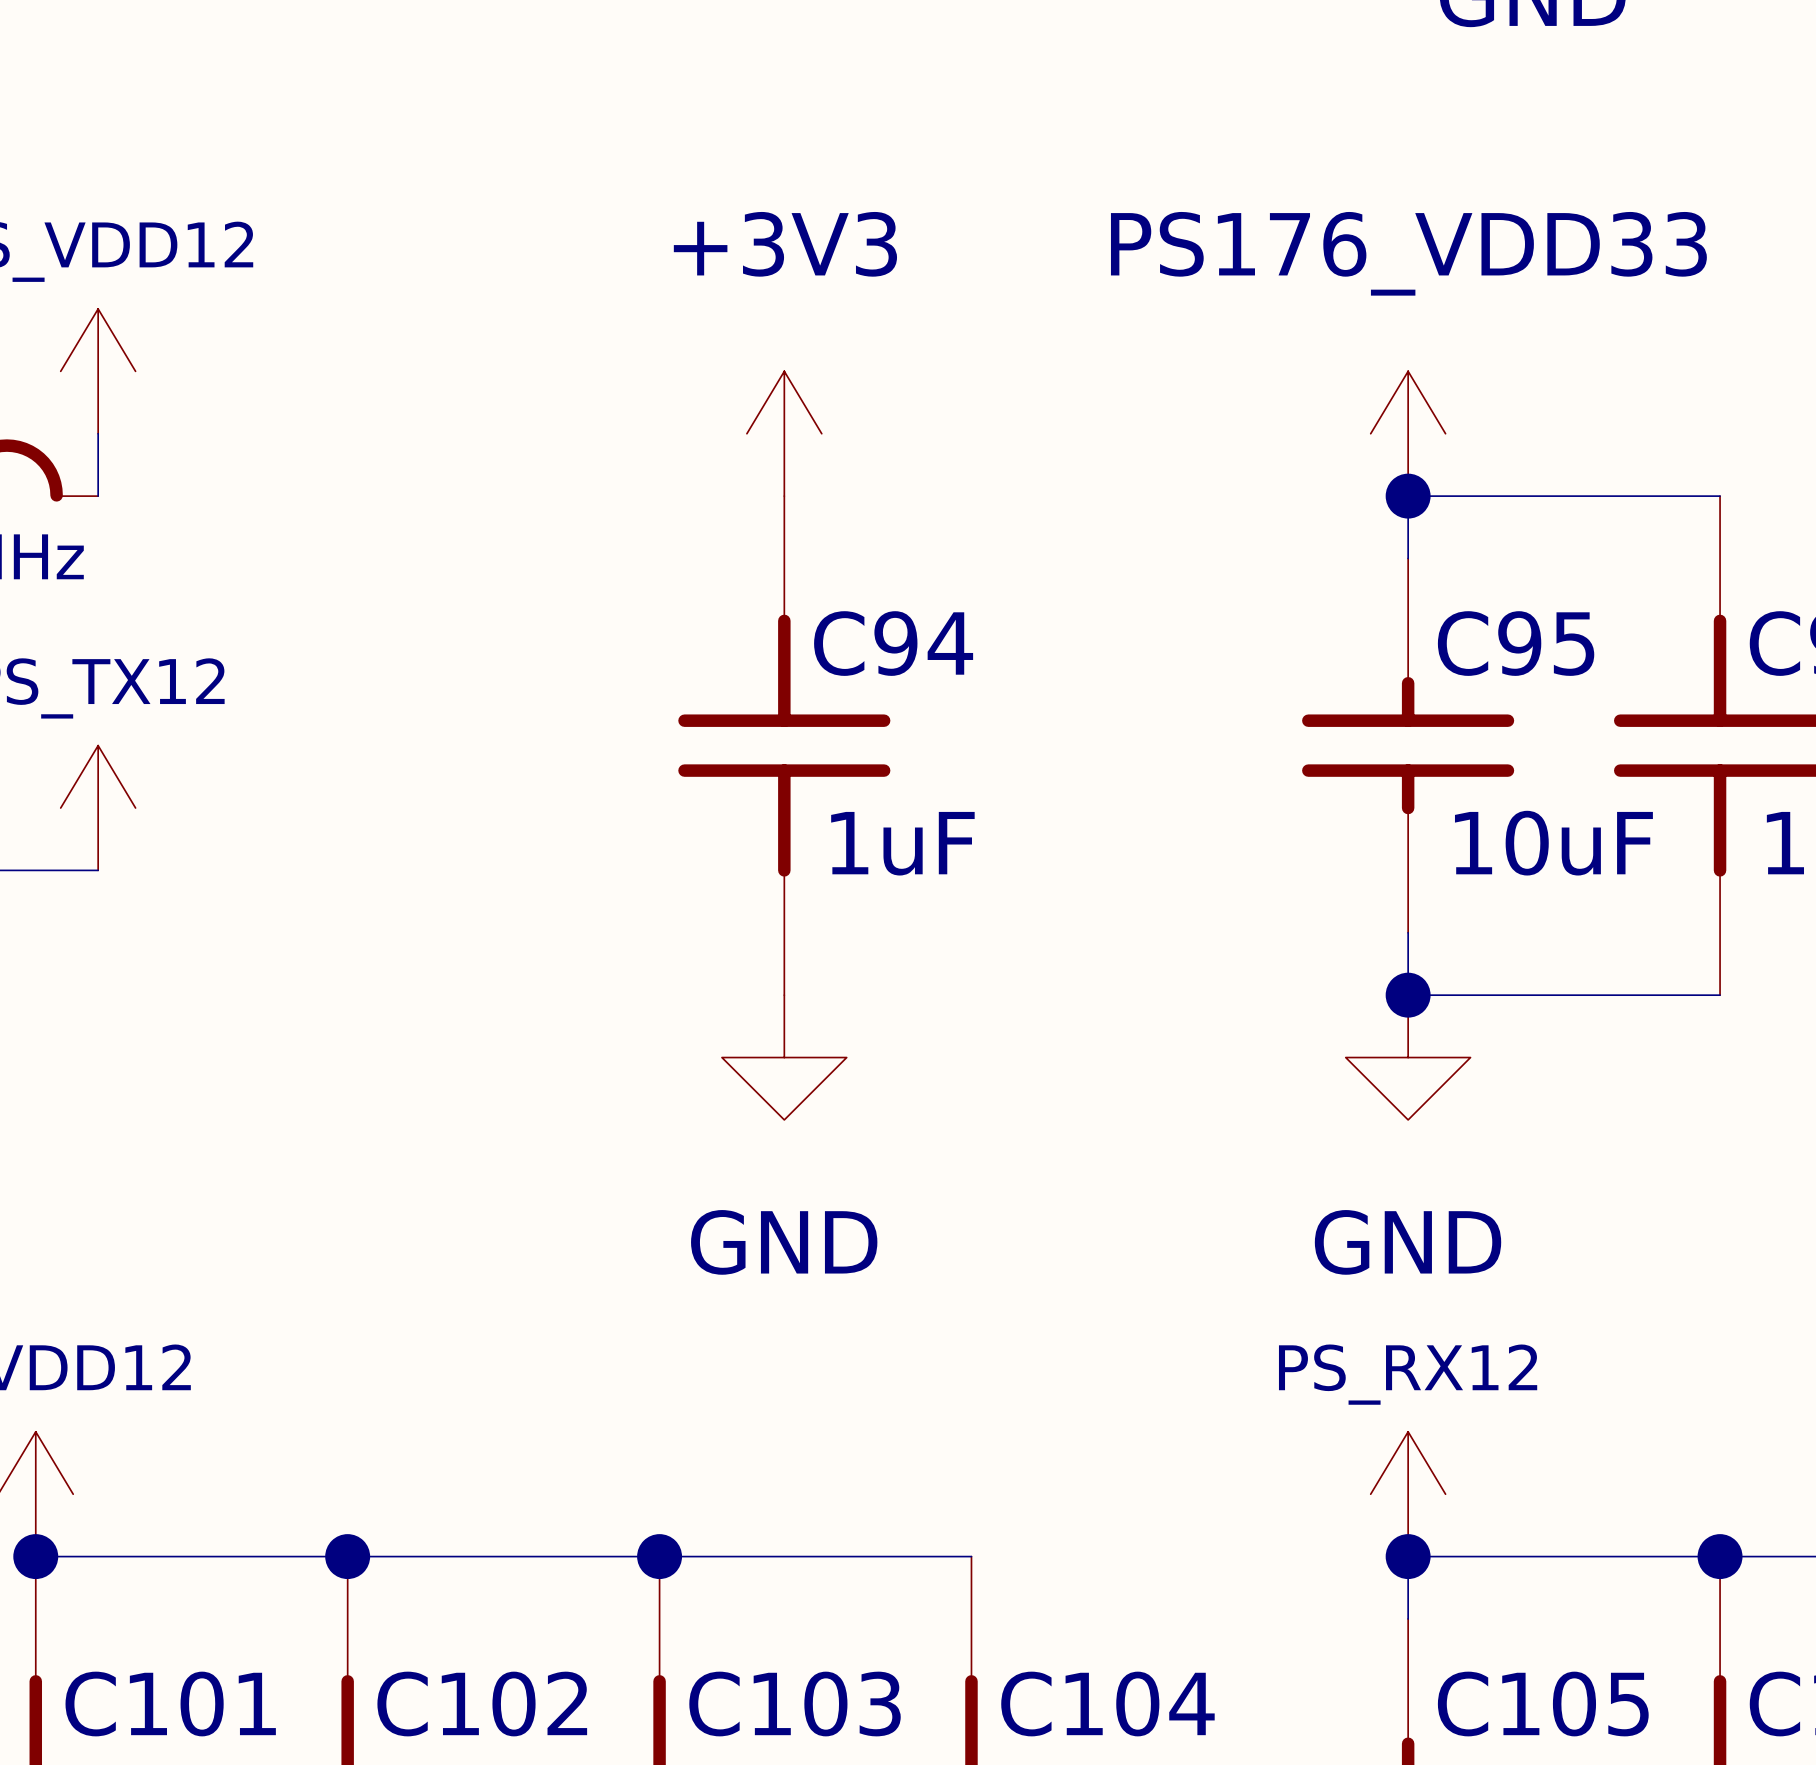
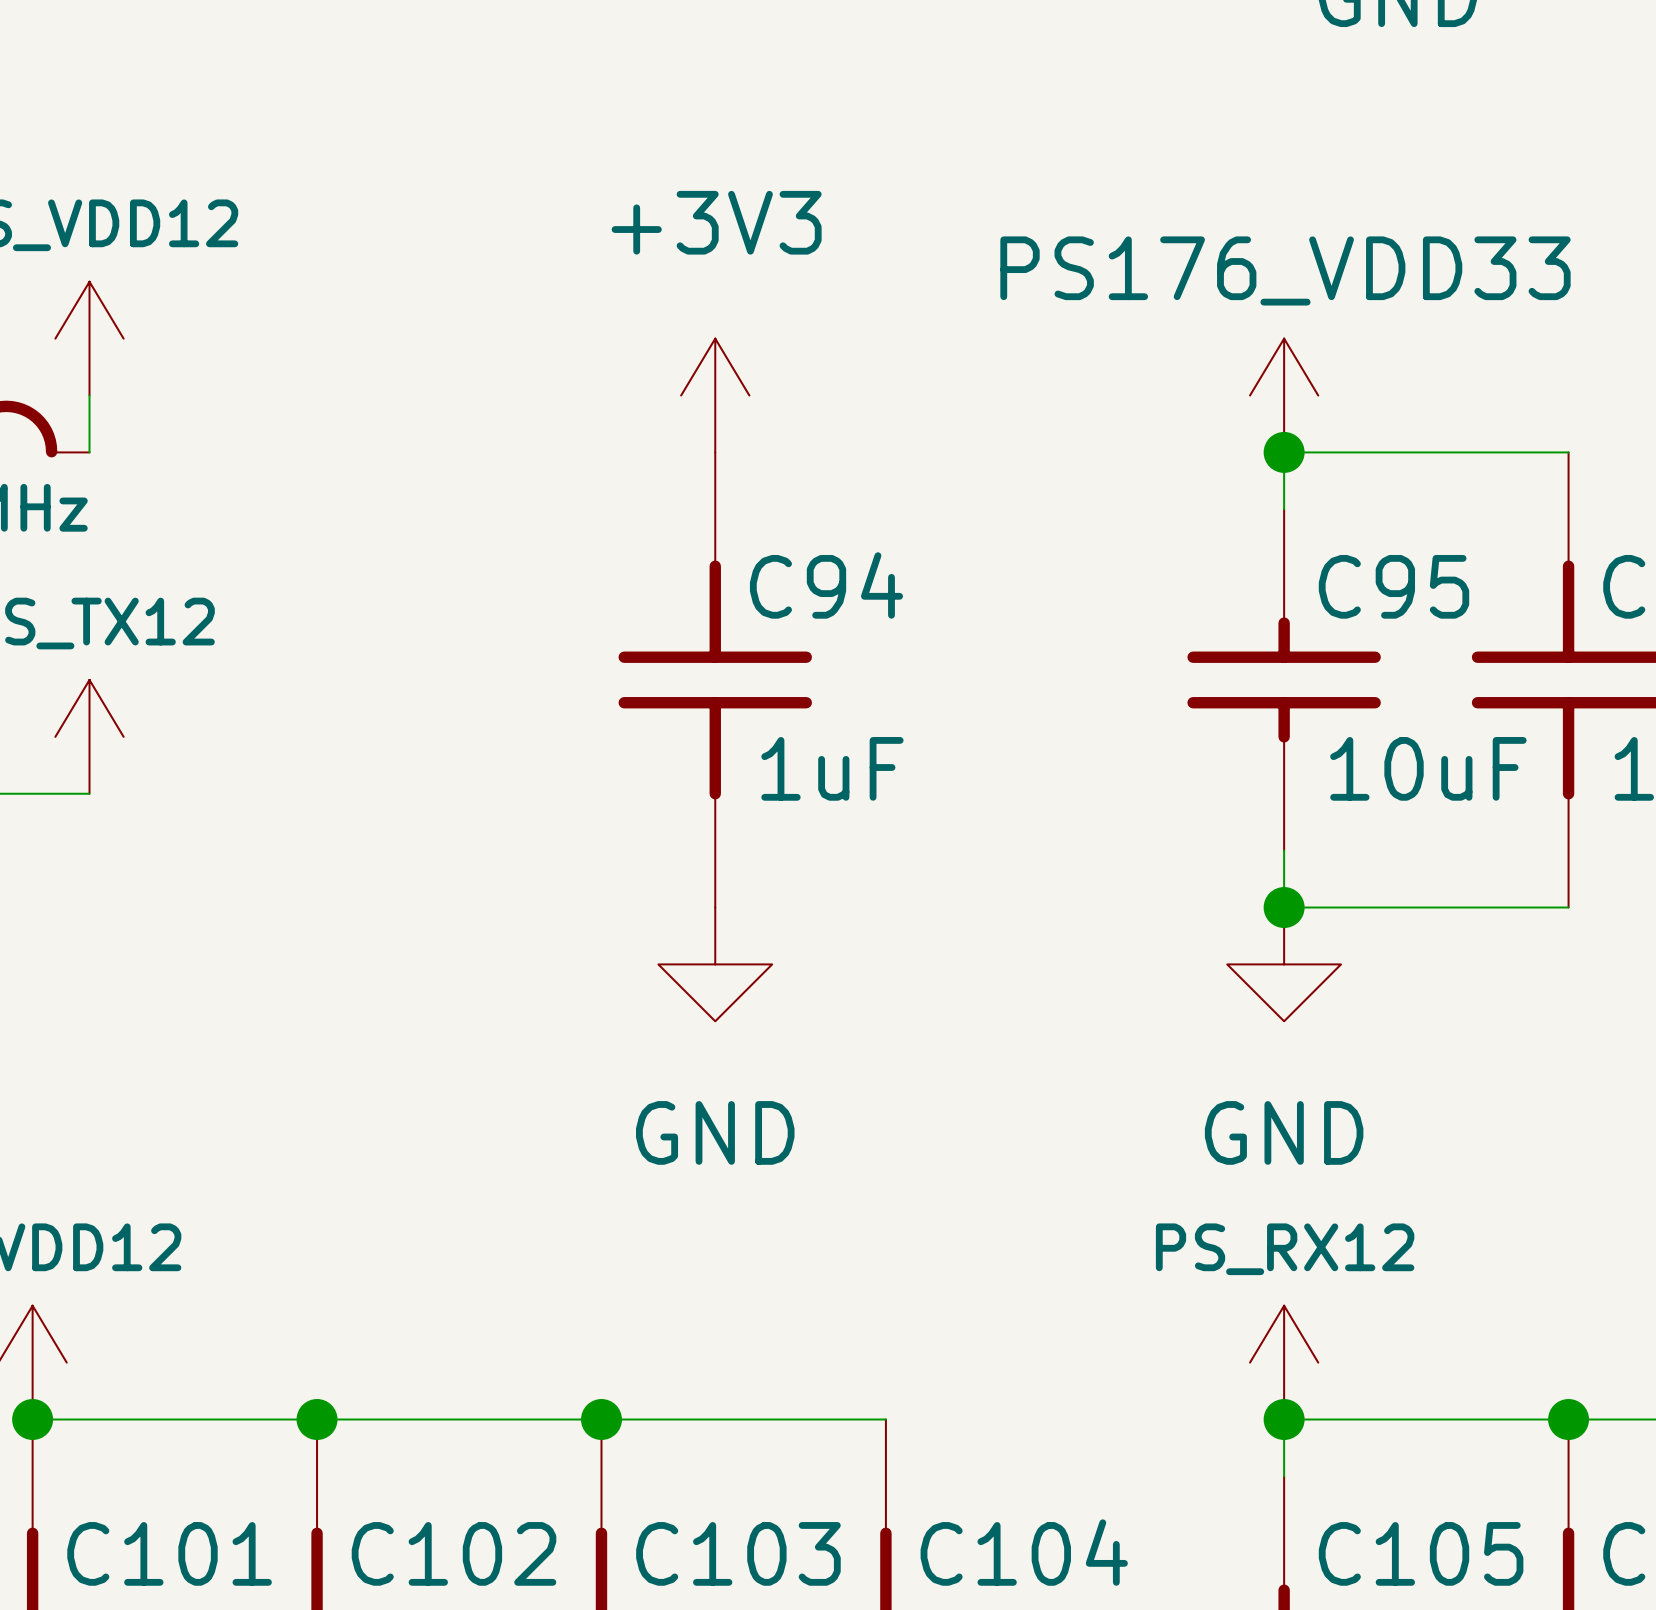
power symbol text position: PS176_VDD33 (1408, 253) -> PS176_VDD33 (1285, 270)

